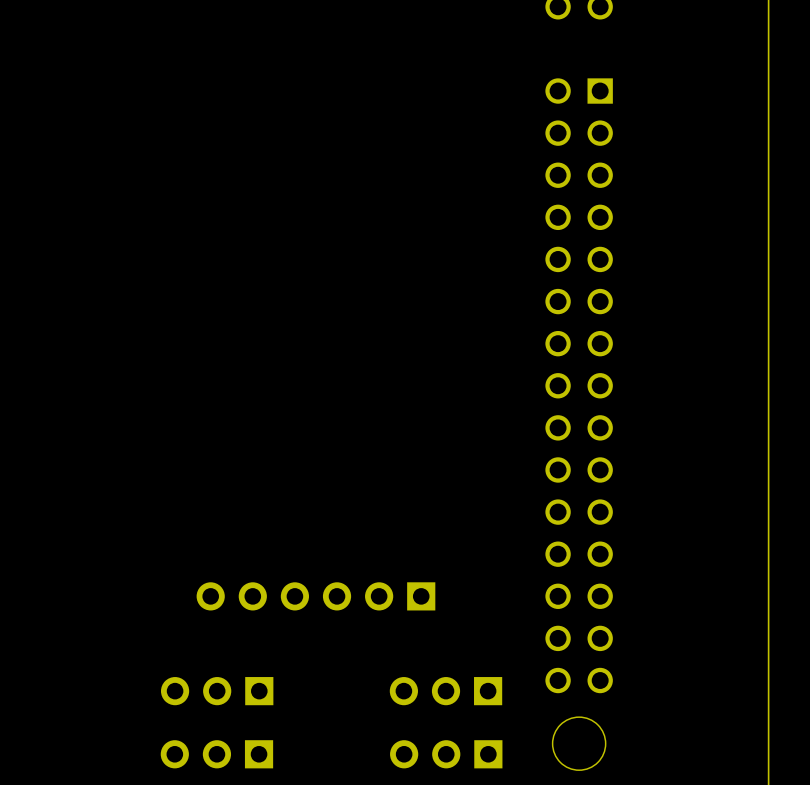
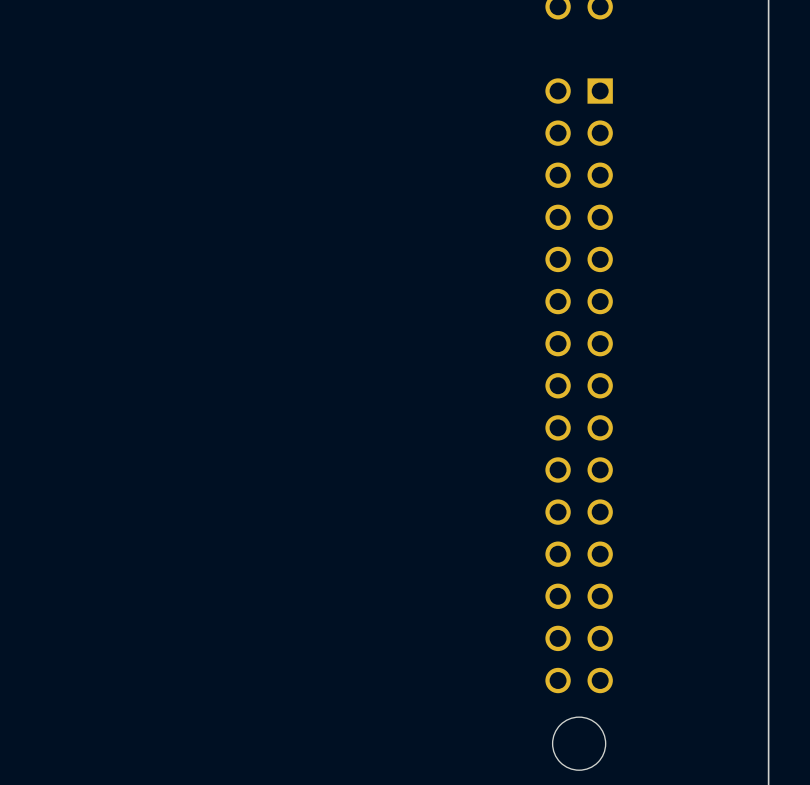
part: (315, 596) -> none
part: (217, 691) -> none
part: (446, 691) -> none
part: (216, 754) -> none
part: (446, 754) -> none

